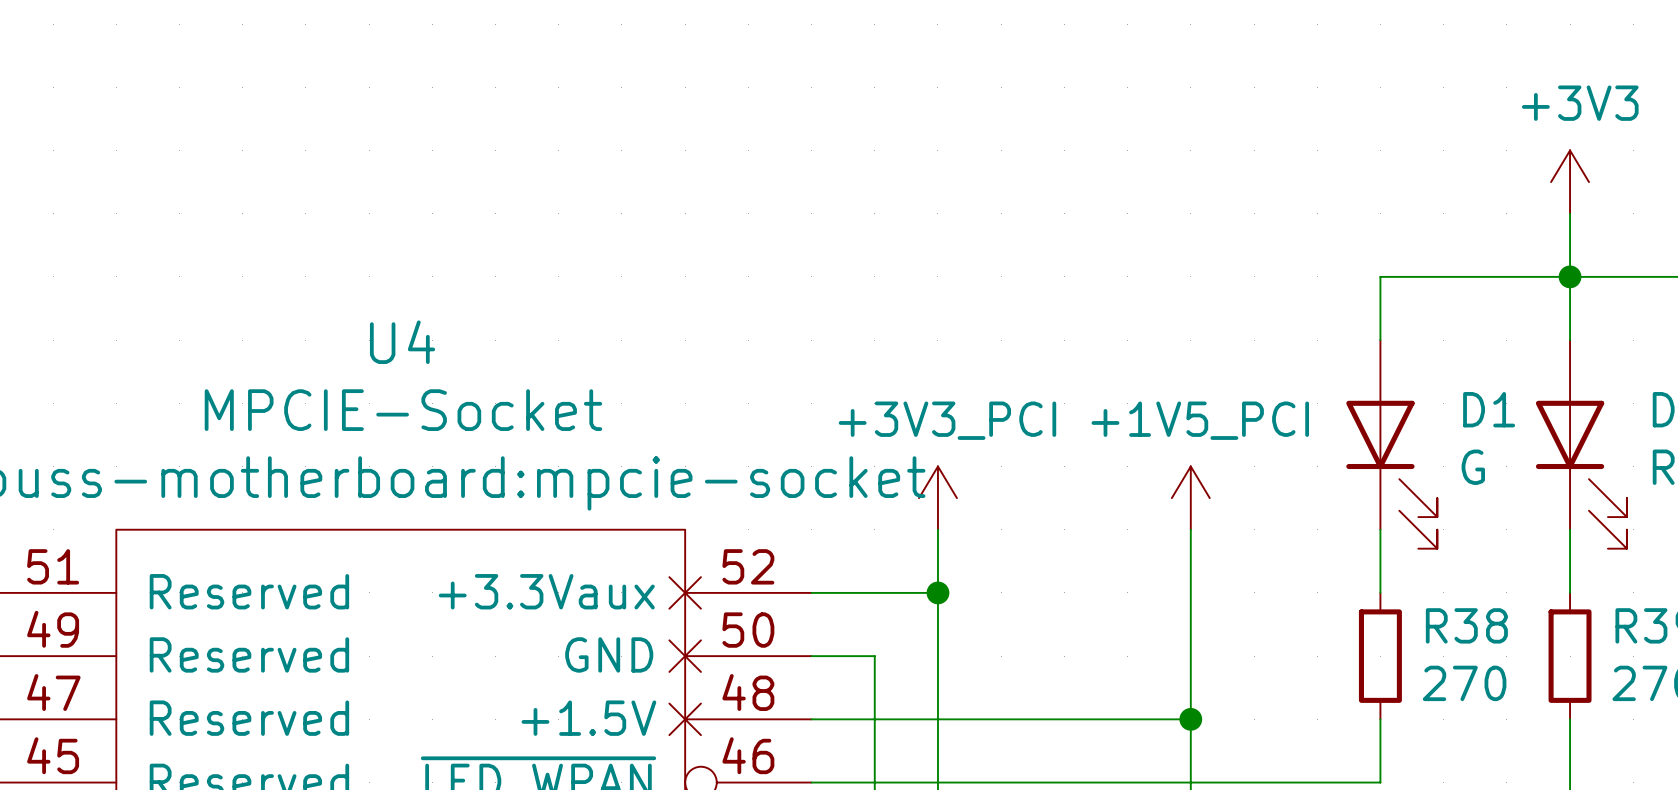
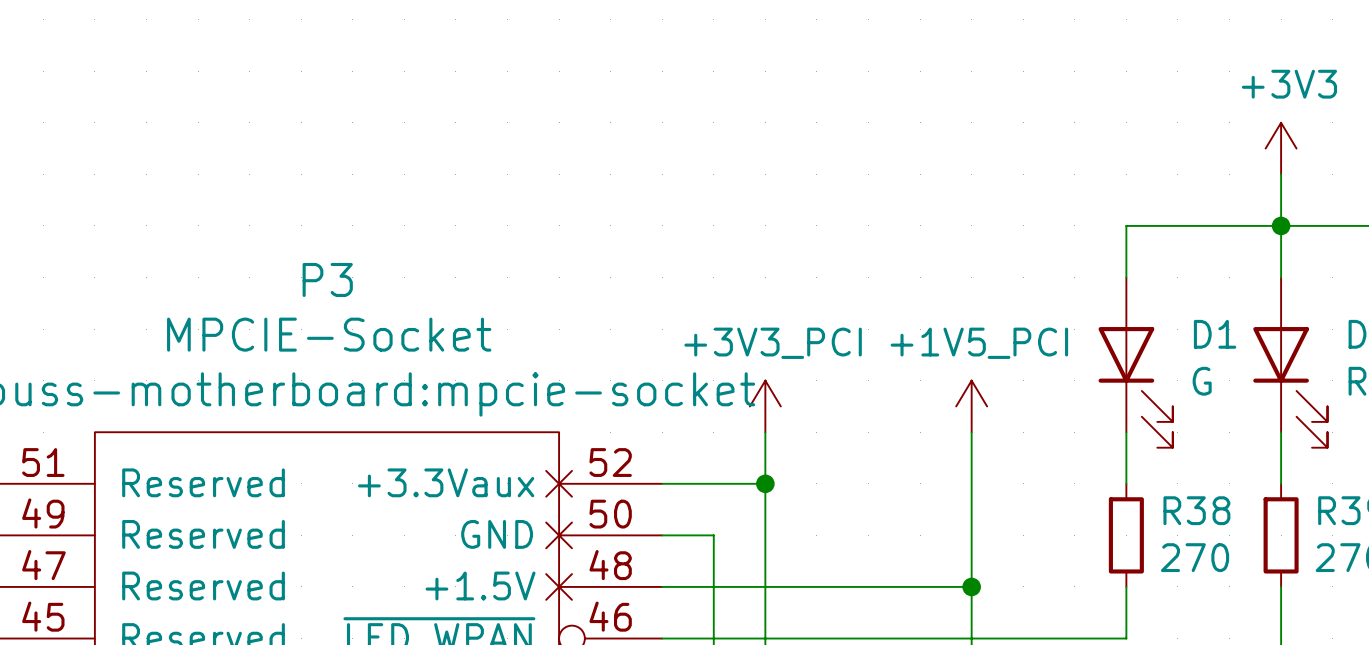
U4 name: U4 (402, 342) -> P3 (327, 279)

